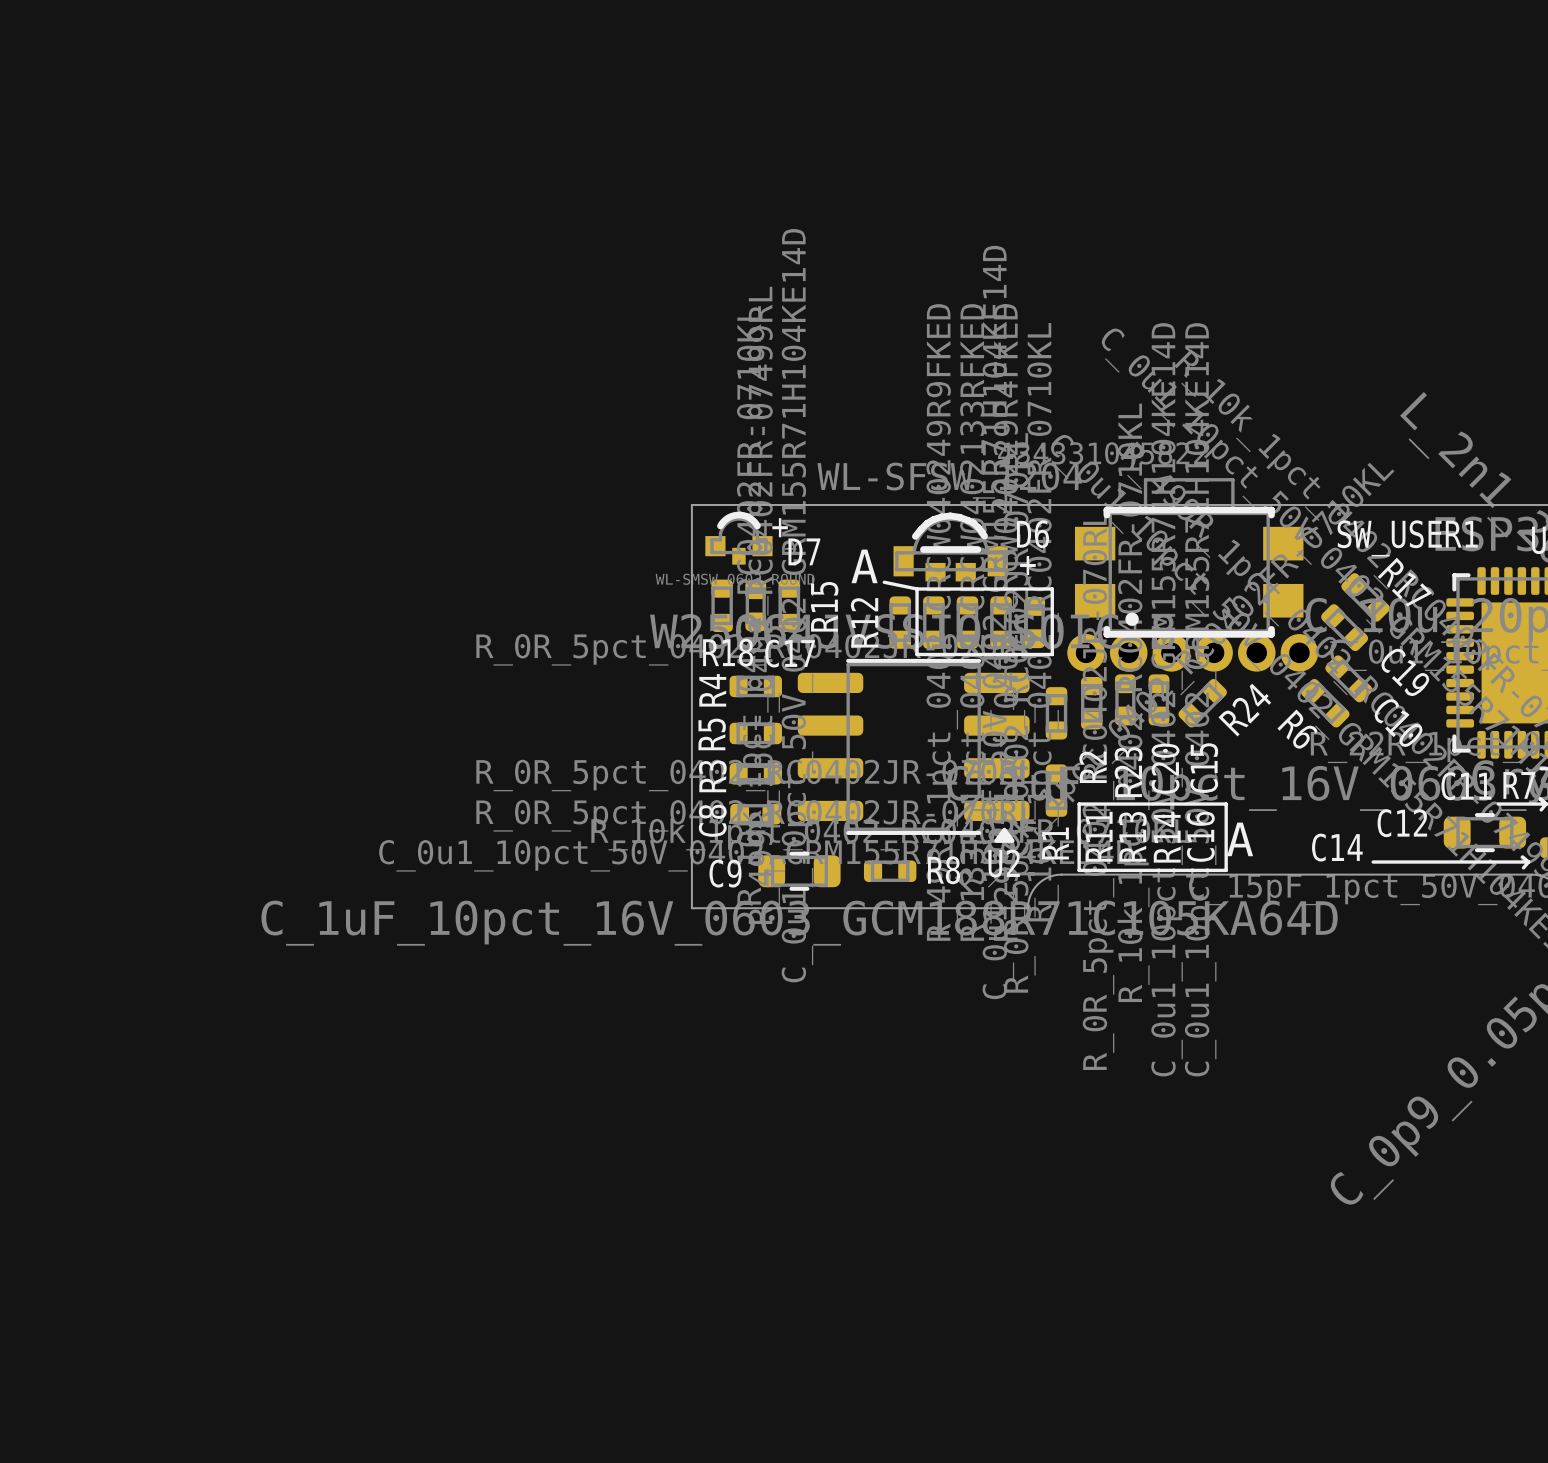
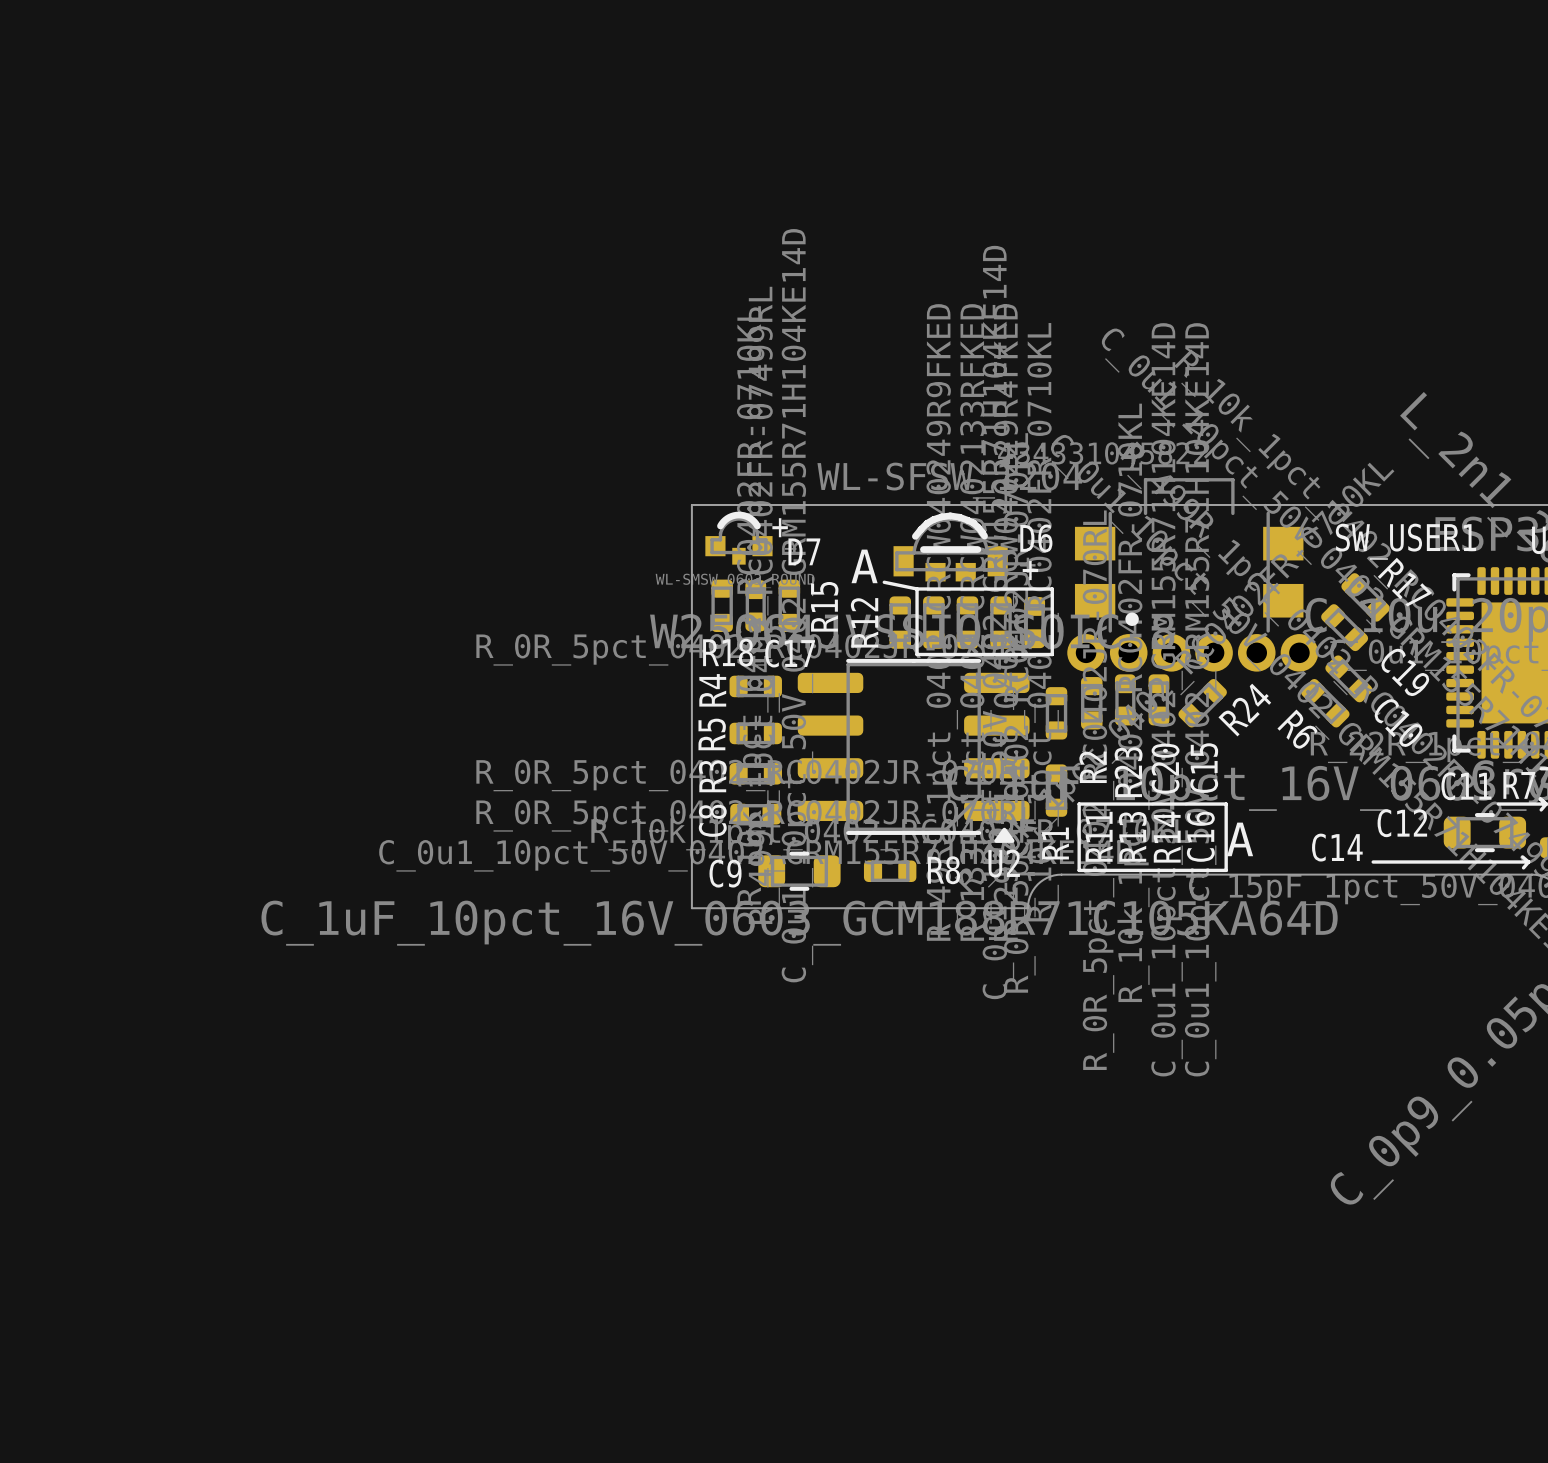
SW_USER1 footprint: [1074, 478, 1304, 638] -> [1074, 478, 1304, 633]
D6 footprint: [893, 512, 1008, 582] -> [893, 512, 1008, 582]

